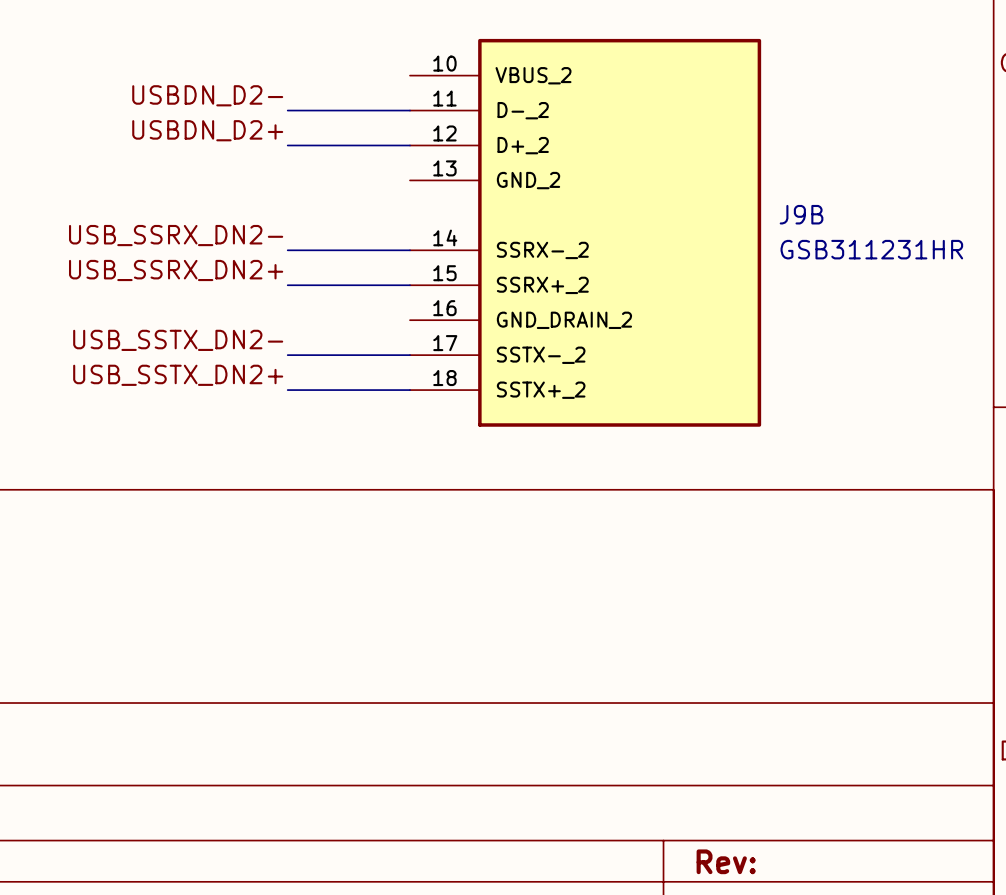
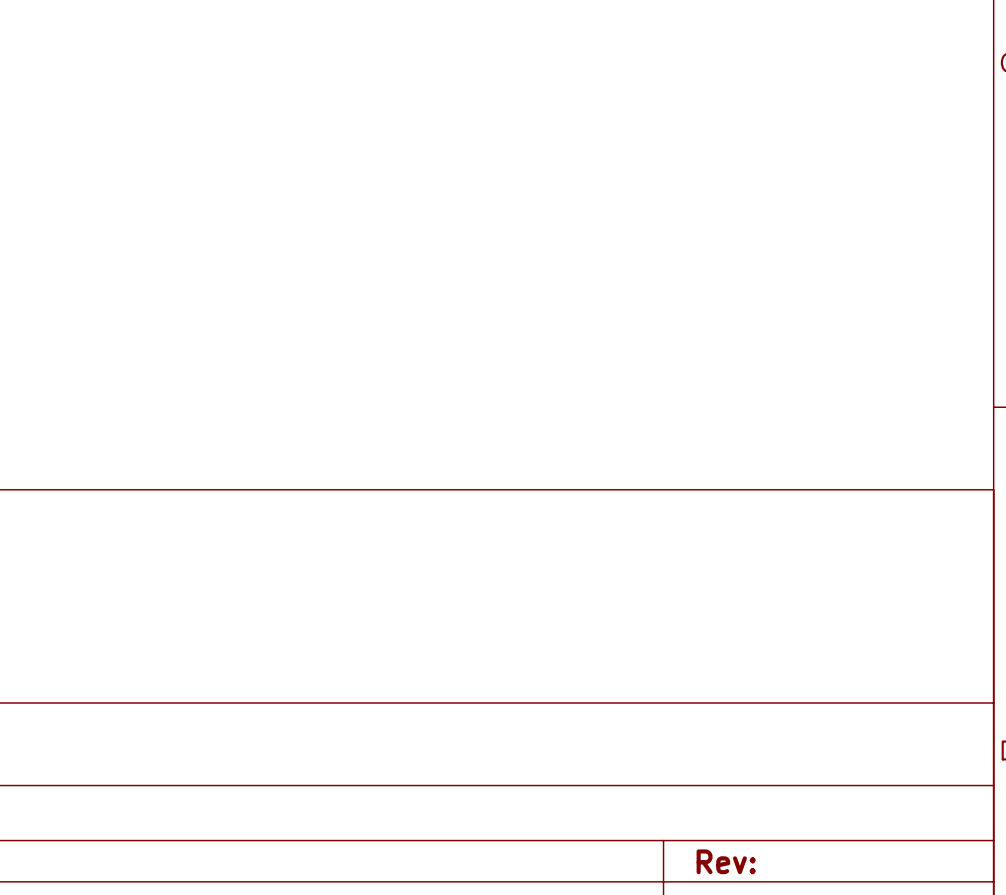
label: USBDN_D2- (207, 95) -> none
wire: (287, 110) (410, 110) -> none
label: USBDN_D2+ (207, 130) -> none
wire: (287, 145) (410, 145) -> none
J9B: GSB311231HR (585, 232) -> none
label: USB_SSRX_DN2- (176, 235) -> none
wire: (287, 250) (410, 250) -> none
label: USB_SSRX_DN2+ (176, 270) -> none
wire: (287, 285) (410, 285) -> none
label: USB_SSTX_DN2- (178, 340) -> none
wire: (287, 355) (410, 355) -> none
label: USB_SSTX_DN2+ (178, 375) -> none
wire: (287, 390) (410, 390) -> none

